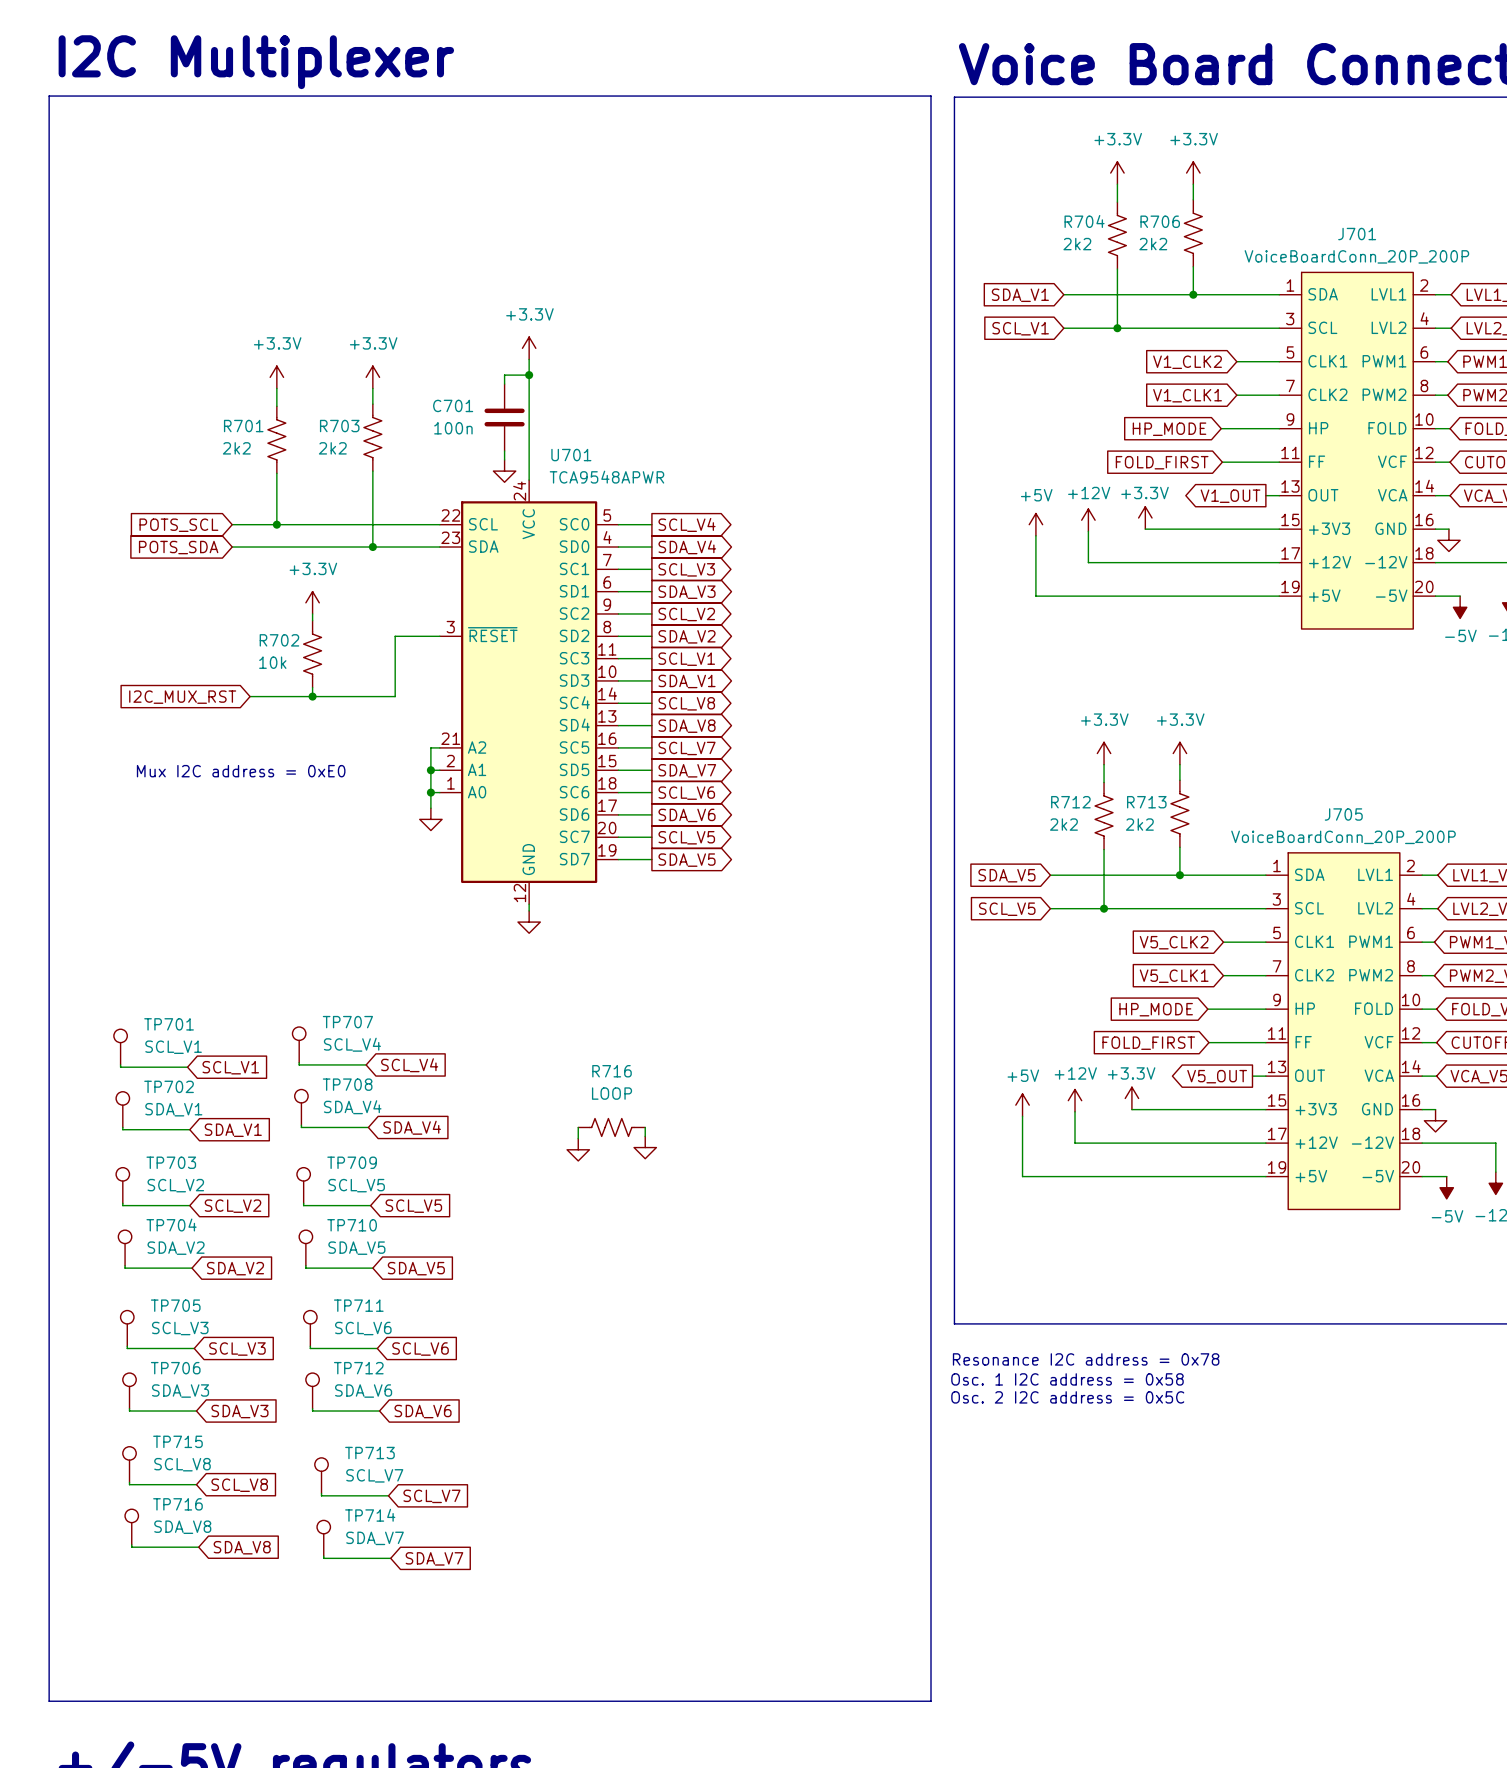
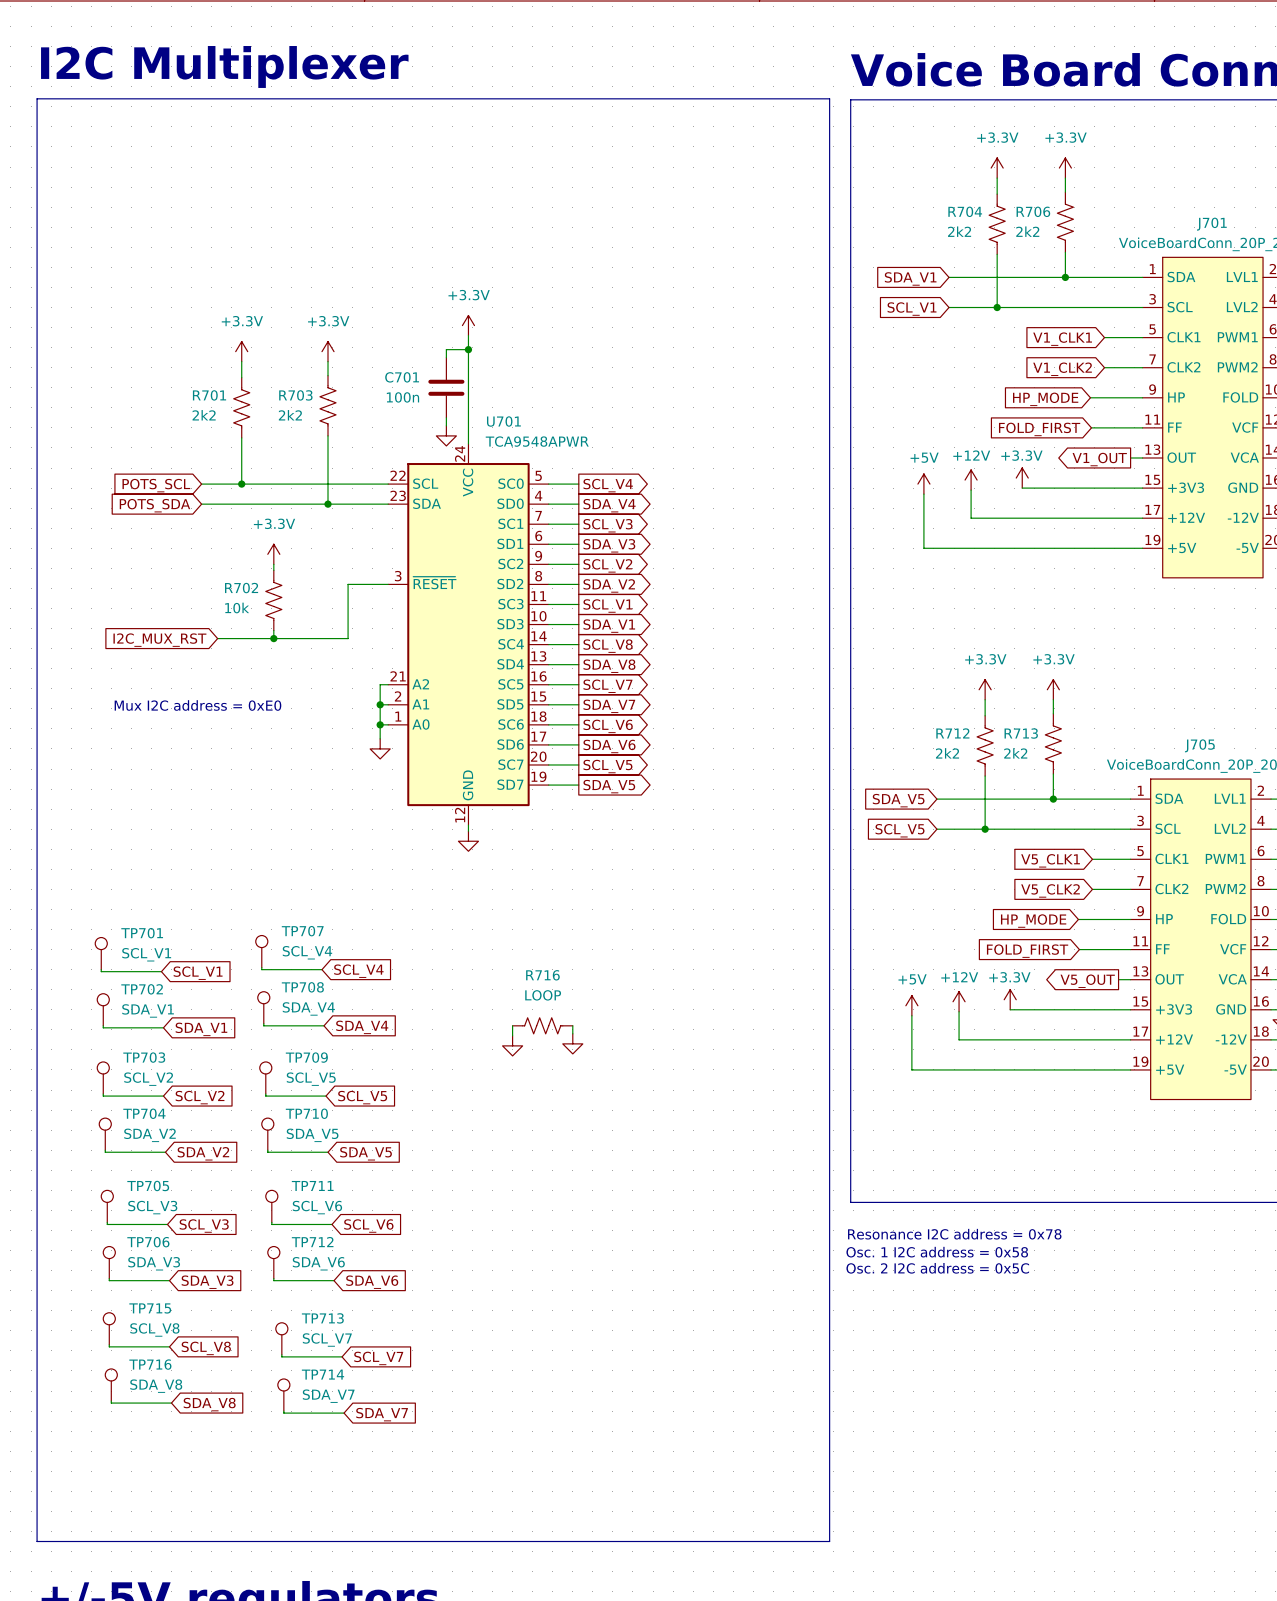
global label: V1_CLK2 (1187, 362) -> V1_CLK1 (1062, 339)
global label: V1_CLK1 (1187, 395) -> V1_CLK2 (1062, 369)
global label: V5_CLK2 (1174, 942) -> V5_CLK1 (1050, 860)
global label: V5_CLK1 (1174, 976) -> V5_CLK2 (1050, 890)

